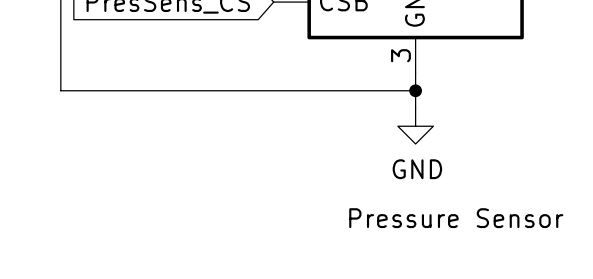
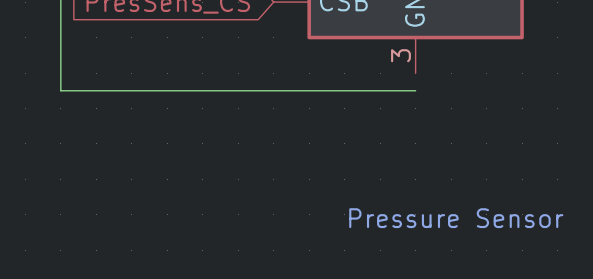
wire: (415, 73) (415, 108) -> none
junction: (415, 90) -> none
power symbol: GND (415, 126) -> none

